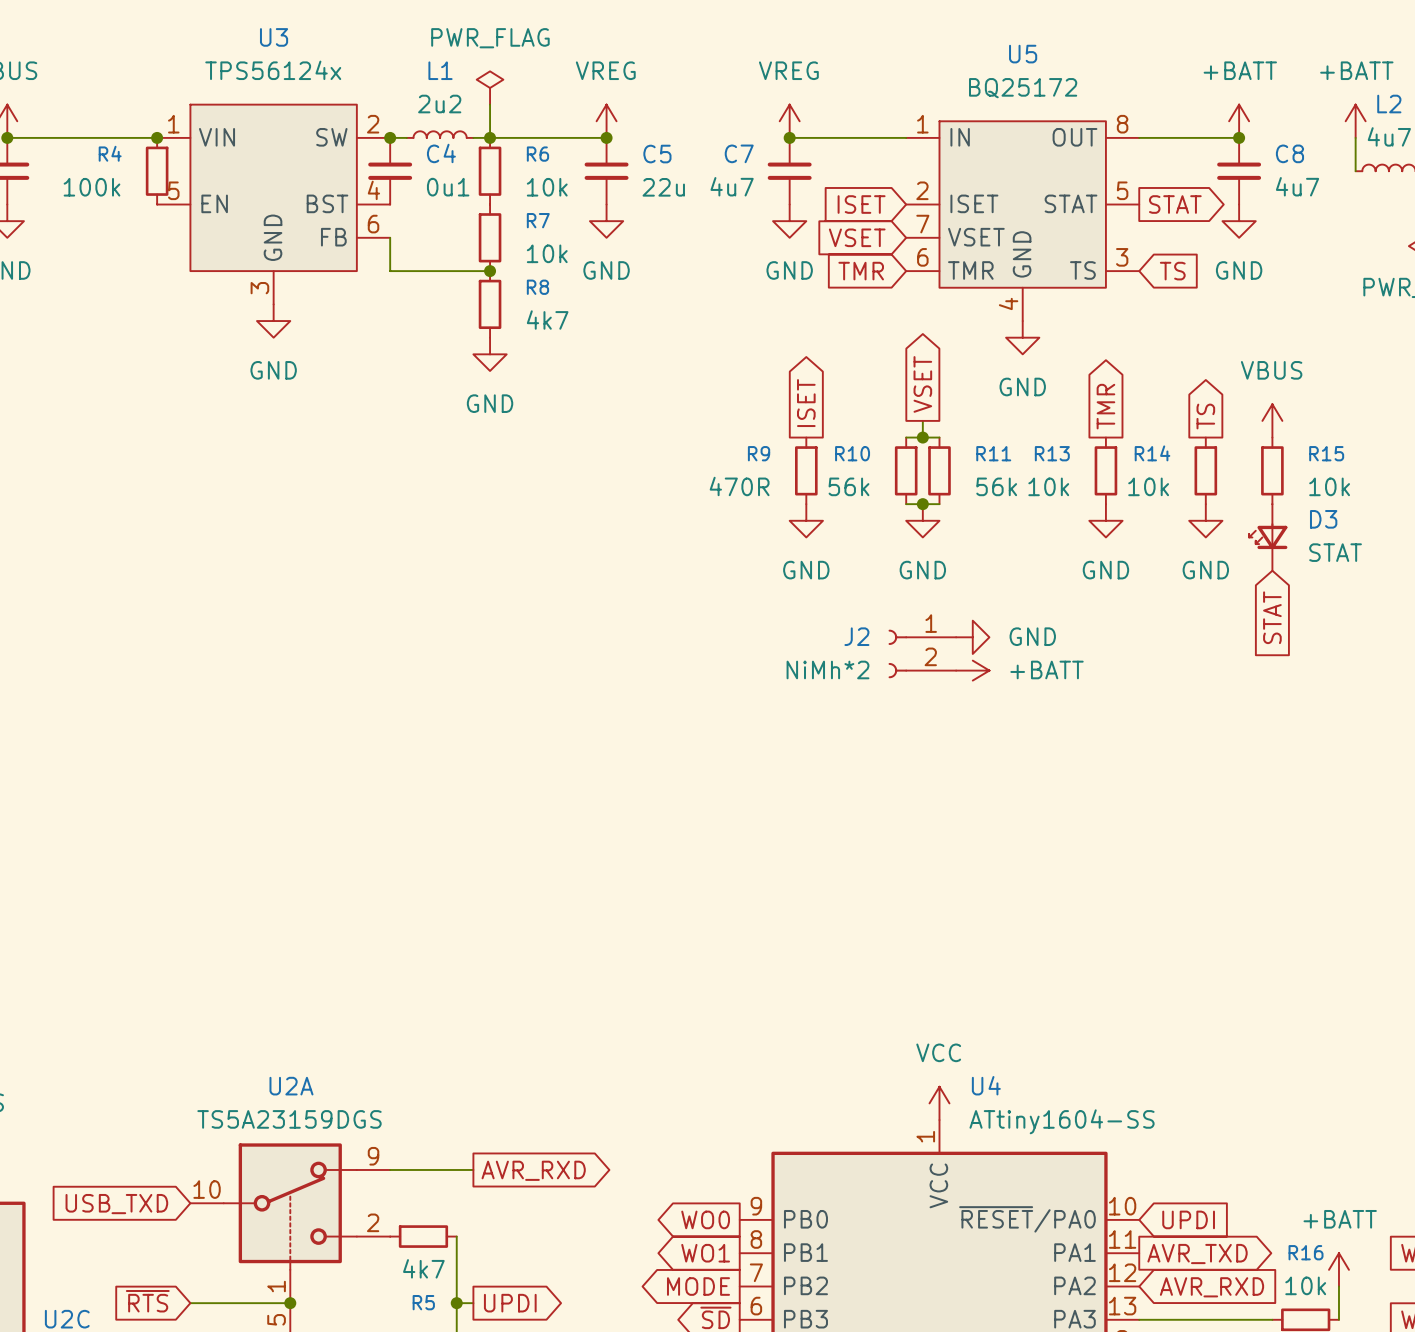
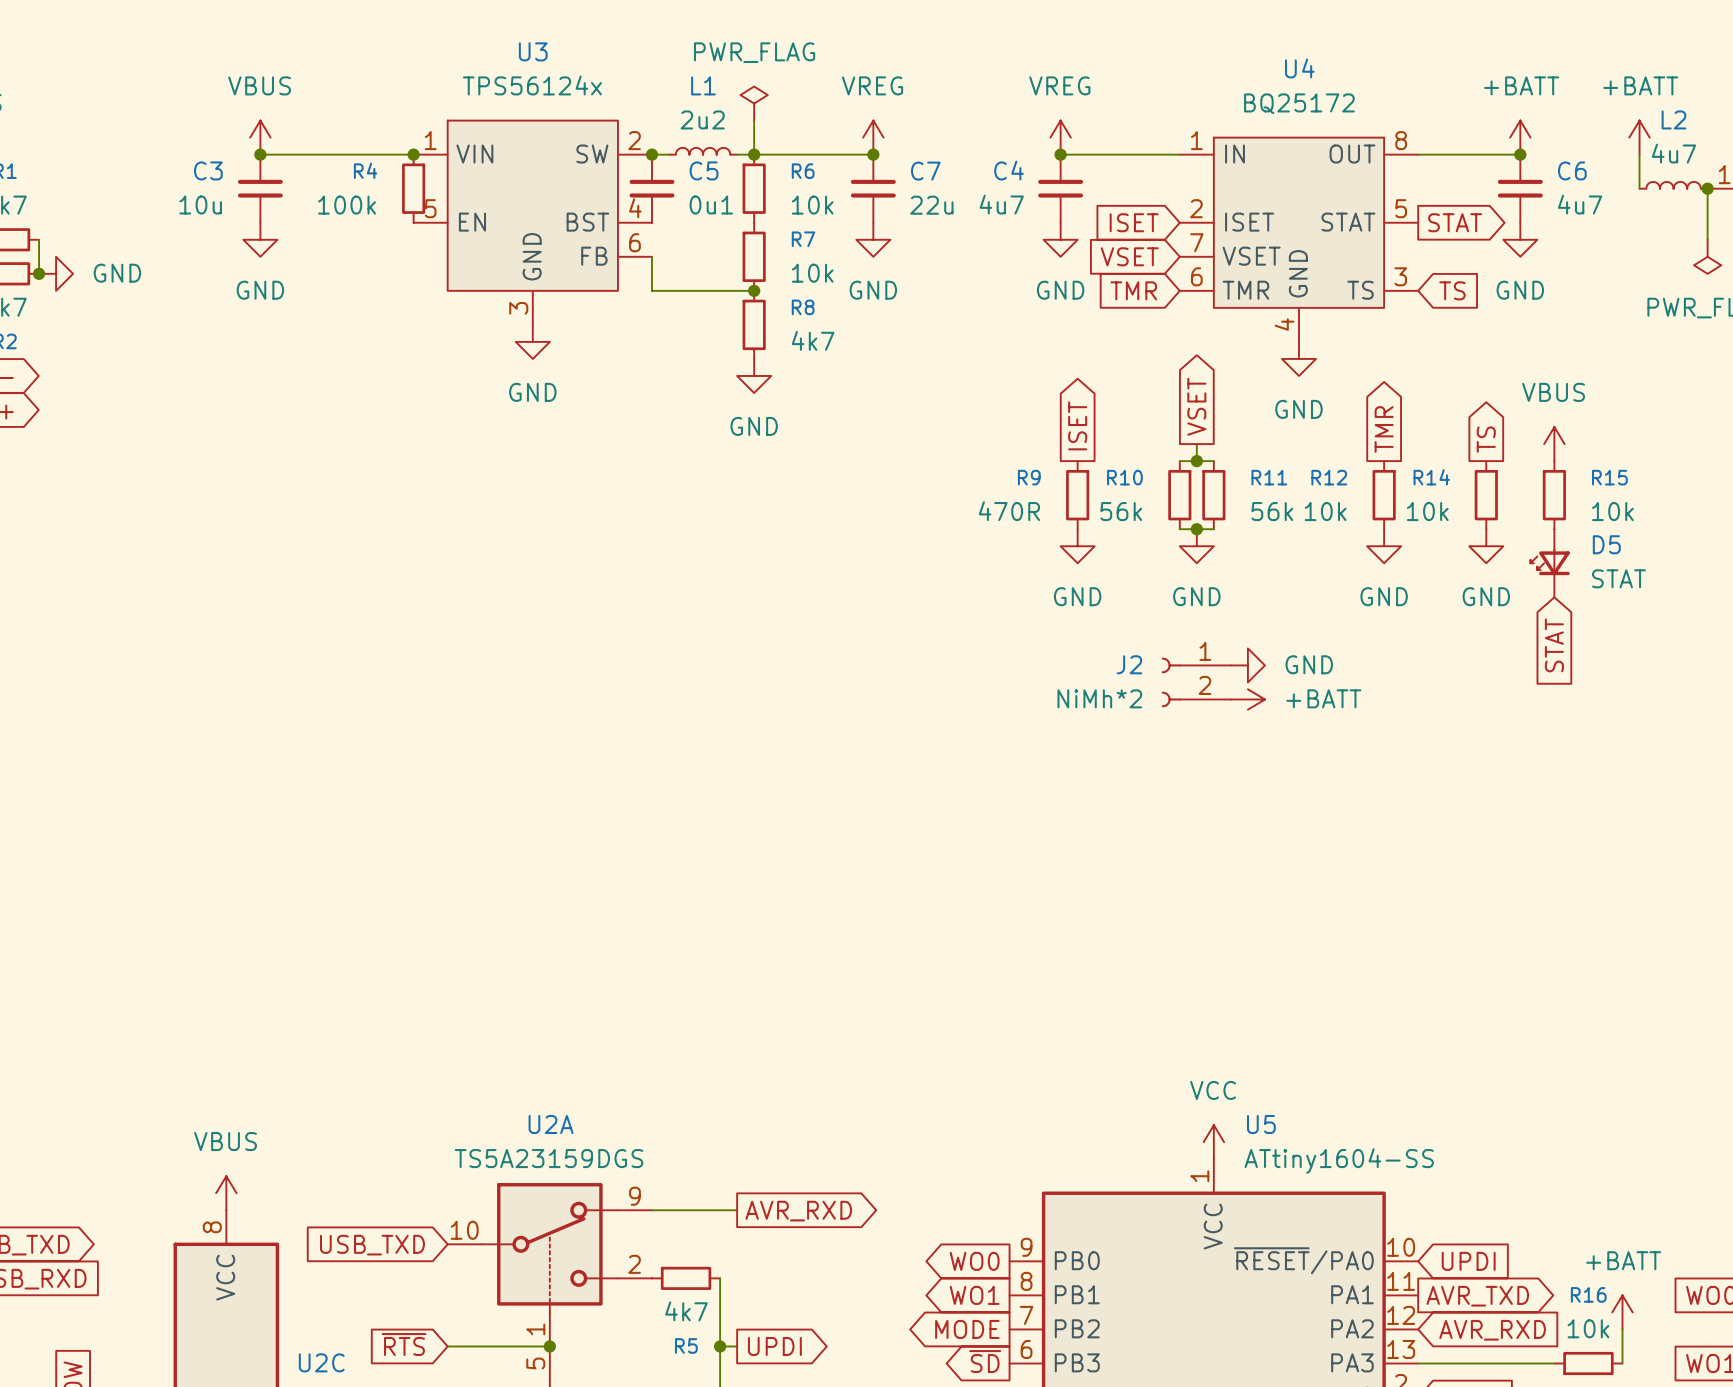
U5 name: U5 (1023, 54) -> U4 (1299, 68)
C4 name: C4 (441, 153) -> C5 (704, 170)
C7 name: C7 (739, 153) -> C4 (1009, 170)
C8 name: C8 (1289, 153) -> C6 (1572, 170)
C5 name: C5 (657, 154) -> C7 (925, 171)
R13 name: R13 (1052, 453) -> R12 (1329, 477)
D3 name: D3 (1323, 519) -> D5 (1606, 544)
U4 name: U4 (986, 1085) -> U5 (1261, 1124)

